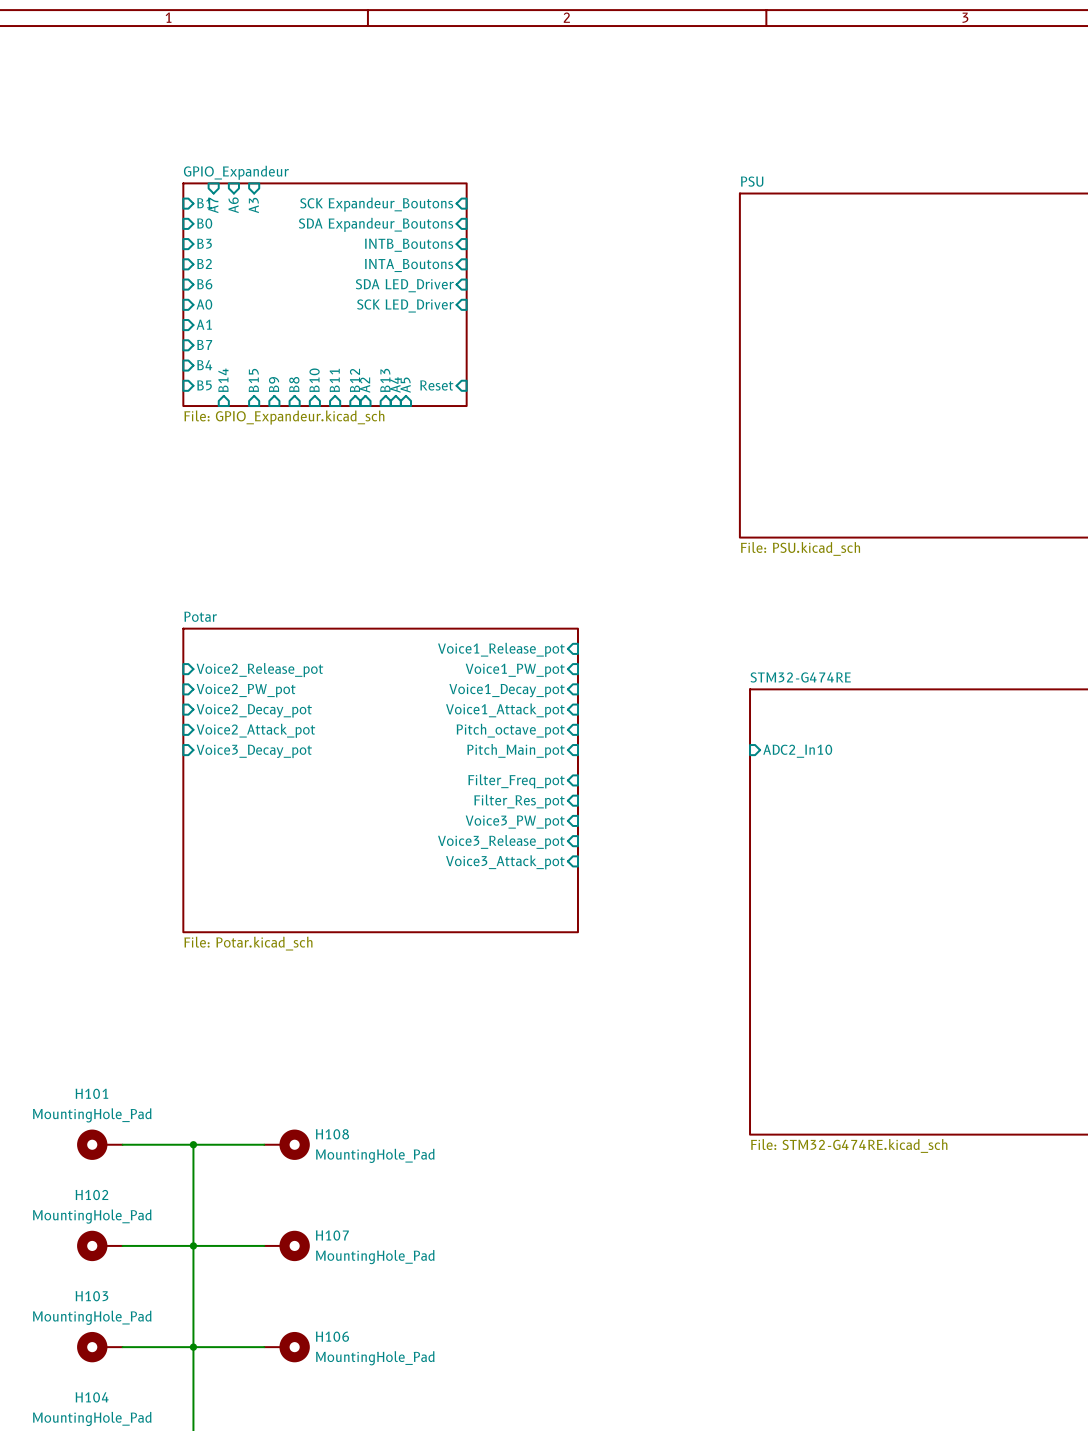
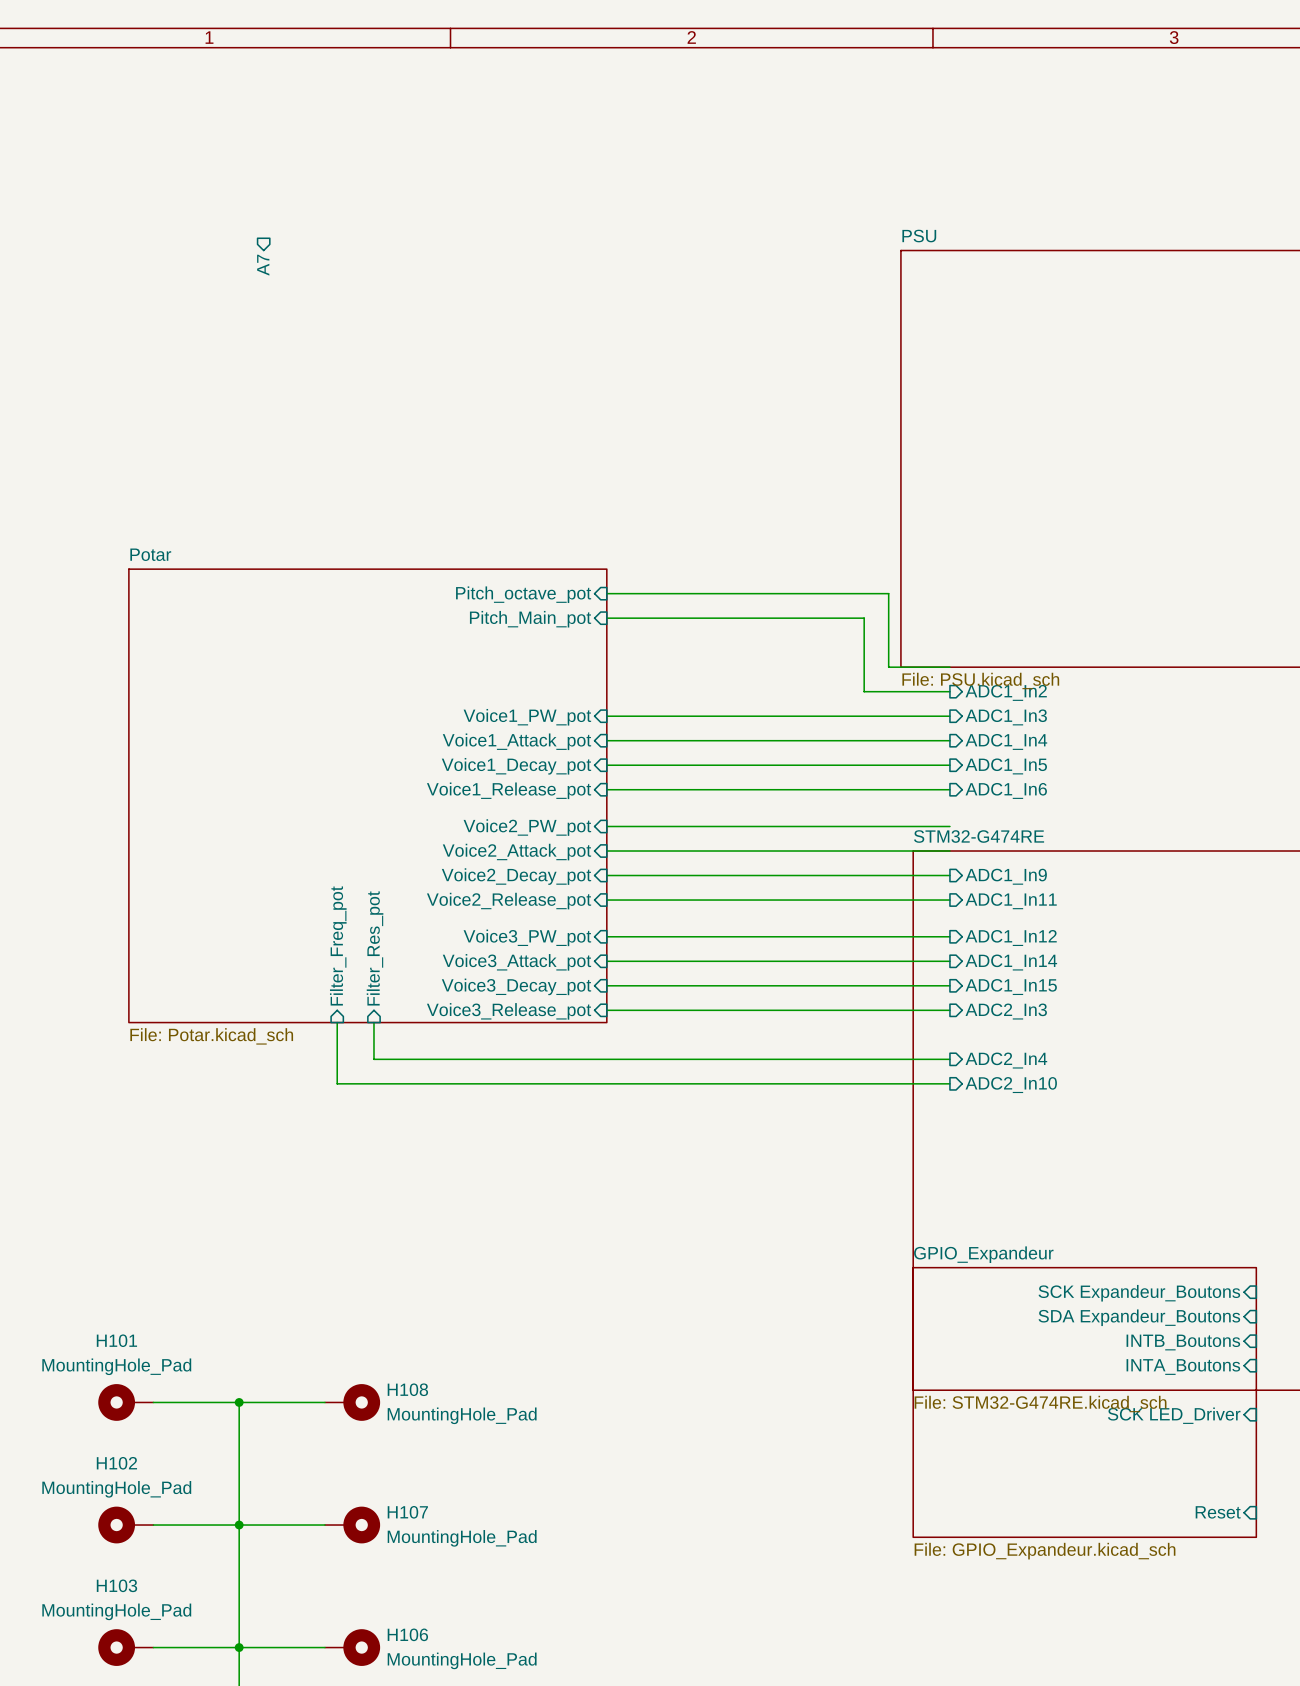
sheet pin: B1 (204, 203) -> none
sheet pin: SCK Expandeur_Boutons (376, 204) -> none
sheet pin: A6 (233, 205) -> none
sheet pin: A3 (253, 205) -> none
sheet pin: B0 (204, 223) -> none
sheet pin: SDA Expandeur_Boutons (376, 224) -> none
sheet pin: B3 (204, 243) -> none
sheet pin: INTB_Boutons (409, 245) -> none
sheet pin: B2 (204, 263) -> none
sheet pin: INTA_Boutons (409, 265) -> none
sheet pin: B6 (204, 284) -> none
sheet pin: SDA LED_Driver (404, 285) -> none
sheet GPIO_Expandeur: File: GPIO_Expandeur.kicad_sch (324, 294) -> none
sheet pin: A0 (204, 304) -> none
sheet pin: SCK LED_Driver (405, 305) -> none
sheet pin: A1 (204, 324) -> none
sheet pin: B7 (204, 344) -> none
sheet pin: B4 (204, 365) -> none
sheet pin: B14 (223, 380) -> none
sheet pin: B15 (253, 380) -> none
sheet pin: B10 (314, 380) -> none
sheet pin: B11 (334, 380) -> none
sheet pin: B12 (354, 380) -> none
sheet pin: B13 (385, 380) -> none
sheet pin: B9 (274, 384) -> none
sheet pin: B8 (294, 384) -> none
sheet pin: A4 (395, 384) -> none
sheet pin: B5 (204, 385) -> none
sheet pin: A2 (365, 385) -> none
sheet pin: A5 (405, 385) -> none
sheet pin: Reset (436, 385) -> none
wire: none -> (606, 593) (888, 593) (888, 667) (949, 667)
sheet pin: none -> Pitch_octave_pot (523, 594)
wire: none -> (606, 618) (864, 618) (864, 691) (949, 691)
sheet pin: none -> Pitch_Main_pot (530, 619)
sheet pin: none -> ADC1_In2 (1006, 692)
wire: none -> (606, 716) (949, 716)
sheet pin: none -> ADC1_In3 (1006, 717)
wire: none -> (606, 740) (949, 740)
sheet pin: none -> ADC1_In4 (1006, 741)
wire: none -> (606, 765) (949, 765)
sheet pin: none -> ADC1_In5 (1006, 766)
wire: none -> (606, 789) (949, 789)
sheet pin: none -> ADC1_In6 (1006, 790)
sheet Potar: none -> File: Potar.kicad_sch (367, 795)
sheet pin position: Voice1_Release_pot (501, 649) -> Voice1_Release_pot (509, 790)
wire: none -> (606, 826) (949, 826)
sheet pin: Voice2_Release_pot (259, 670) -> none
sheet pin: none -> Voice2_PW_pot (527, 827)
sheet pin position: Voice1_PW_pot (515, 670) -> Voice1_PW_pot (527, 717)
wire: none -> (606, 851) (949, 851)
sheet pin: Voice2_PW_pot (246, 690) -> none
sheet pin: none -> Voice2_Attack_pot (516, 852)
sheet pin position: Voice1_Decay_pot (507, 690) -> Voice1_Decay_pot (516, 766)
wire: none -> (606, 875) (949, 875)
sheet pin: Voice2_Decay_pot (254, 710) -> none
sheet pin: none -> Voice2_Decay_pot (516, 876)
sheet pin position: Voice1_Attack_pot (505, 710) -> Voice1_Attack_pot (516, 741)
sheet pin: none -> ADC1_In9 (1006, 876)
wire: none -> (606, 900) (949, 900)
sheet pin: Voice2_Attack_pot (255, 730) -> none
sheet pin: none -> Voice2_Release_pot (509, 901)
sheet pin: Pitch_octave_pot (510, 730) -> none
sheet pin: none -> ADC1_In11 (1011, 901)
sheet pin: Voice3_Decay_pot (254, 751) -> none
sheet pin: Pitch_Main_pot (515, 751) -> none
sheet pin position: ADC2_In10 (797, 751) -> ADC2_In10 (1011, 1085)
wire: none -> (606, 936) (949, 936)
sheet pin: none -> ADC1_In12 (1011, 938)
sheet pin: none -> Filter_Freq_pot (338, 945)
sheet pin: none -> Filter_Res_pot (375, 948)
sheet Potar: File: Potar.kicad_sch (380, 780) -> none
wire: none -> (606, 961) (949, 961)
sheet pin: Filter_Freq_pot (516, 781) -> none
sheet pin: none -> ADC1_In14 (1011, 962)
wire: none -> (606, 985) (949, 985)
sheet pin: none -> Voice3_Decay_pot (516, 986)
sheet pin: Filter_Res_pot (519, 801) -> none
sheet pin: none -> ADC1_In15 (1011, 987)
wire: none -> (606, 1010) (949, 1010)
sheet pin position: Voice3_PW_pot (515, 822) -> Voice3_PW_pot (527, 937)
sheet pin: none -> ADC2_In3 (1006, 1011)
wire: none -> (337, 1022) (337, 1083) (949, 1083)
wire: none -> (373, 1022) (373, 1059) (949, 1059)
sheet pin position: Voice3_Release_pot (501, 842) -> Voice3_Release_pot (509, 1011)
sheet pin position: Voice3_Attack_pot (505, 862) -> Voice3_Attack_pot (516, 962)
sheet pin: none -> ADC2_In4 (1006, 1060)
sheet pin: none -> SCK Expandeur_Boutons (1139, 1293)
sheet pin: none -> SDA Expandeur_Boutons (1139, 1317)
sheet pin: none -> INTB_Boutons (1183, 1342)
sheet pin: none -> INTA_Boutons (1183, 1367)
sheet GPIO_Expandeur: none -> File: GPIO_Expandeur.kicad_sch (1084, 1402)
sheet pin: none -> SCK LED_Driver (1174, 1415)
sheet pin: none -> Reset (1218, 1512)

